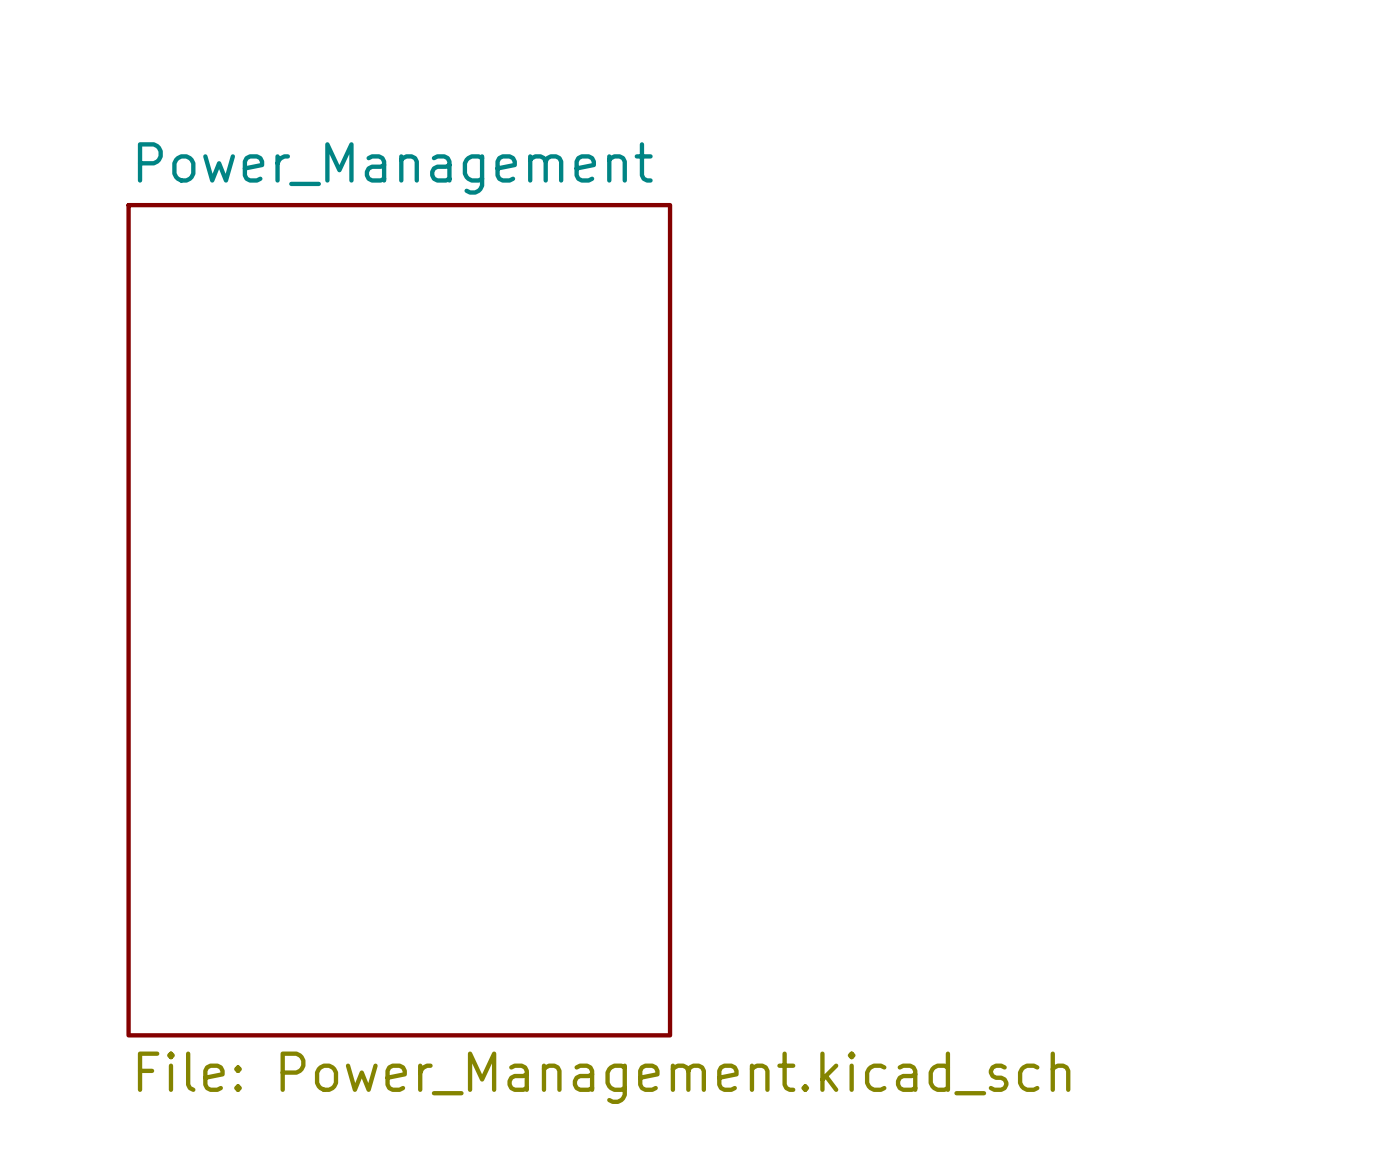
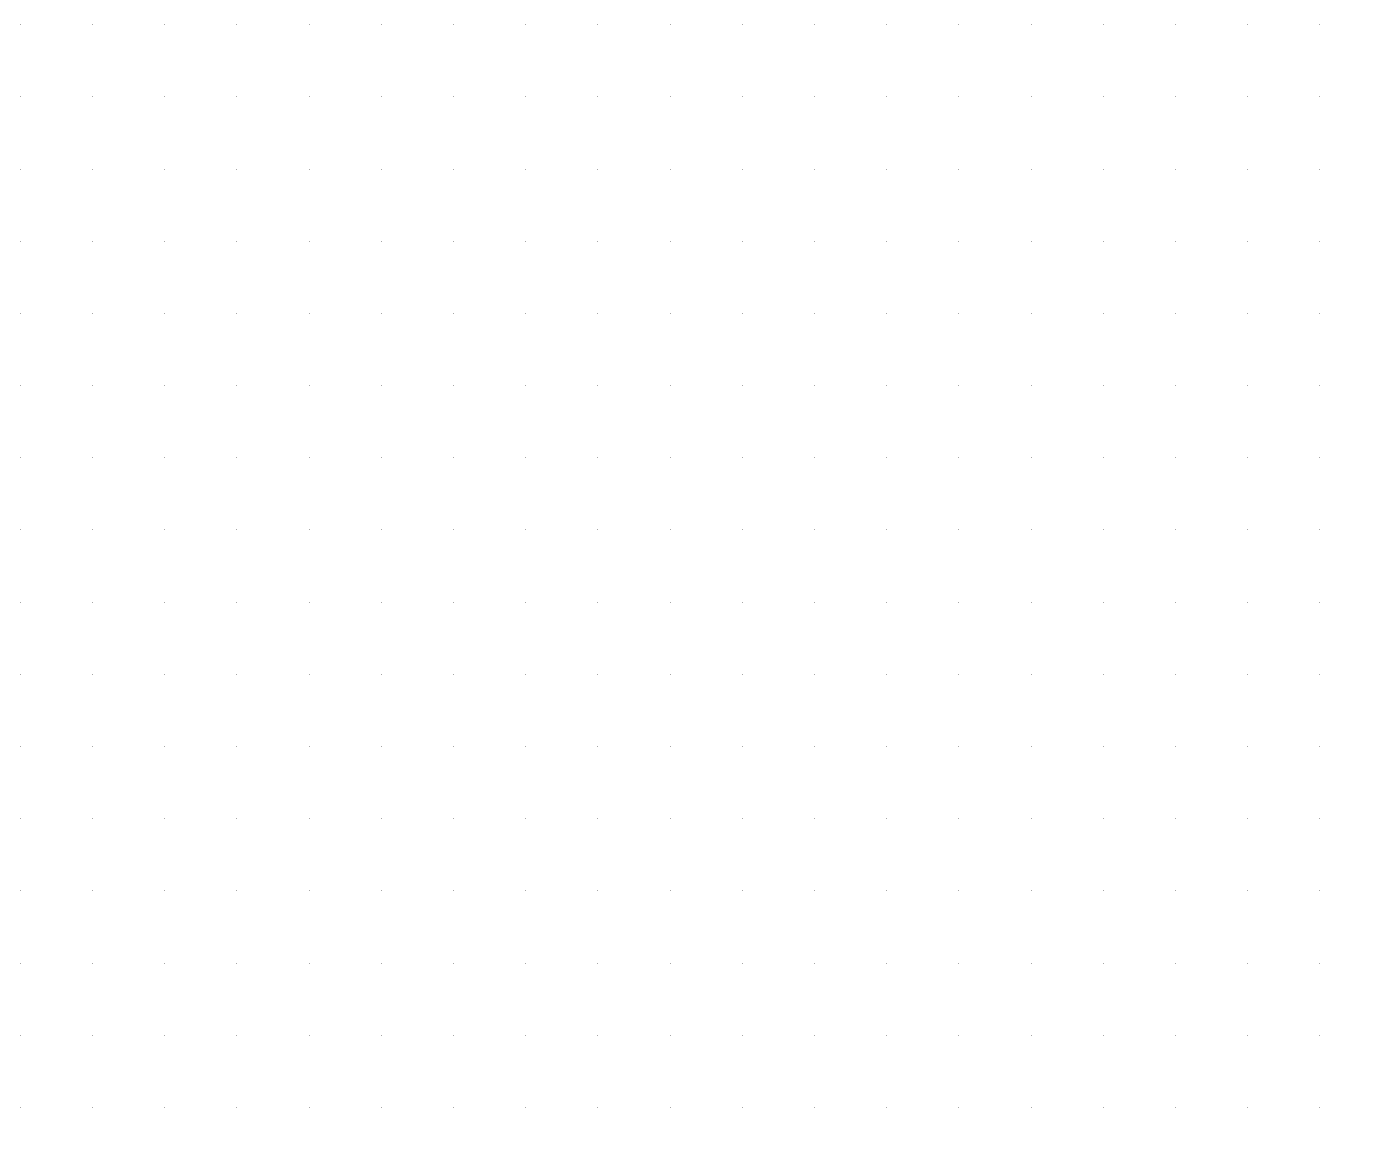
sheet Power_Management: File: Power_Management.kicad_sch (399, 620) -> none

